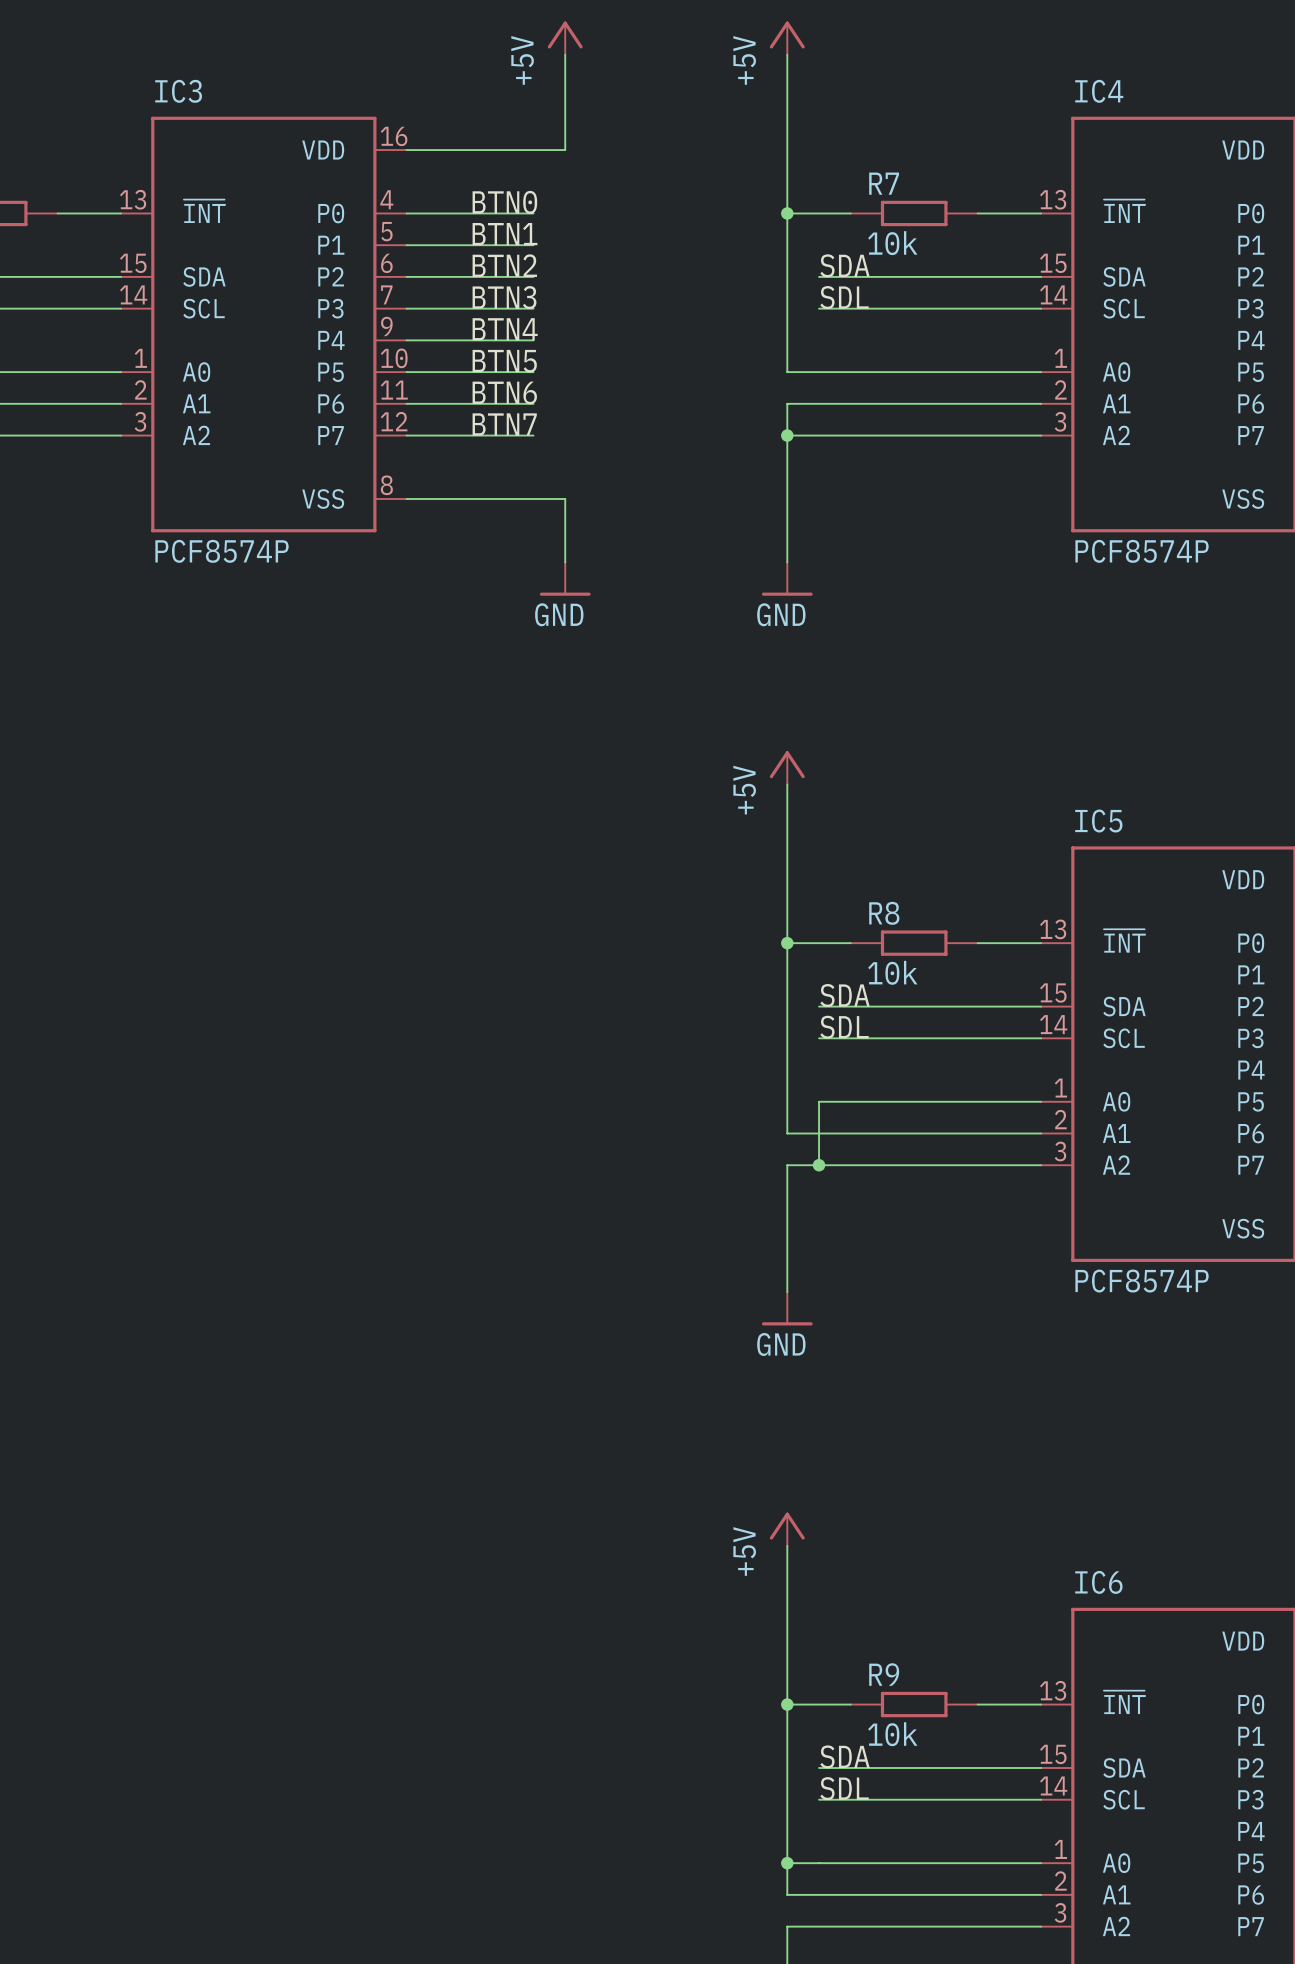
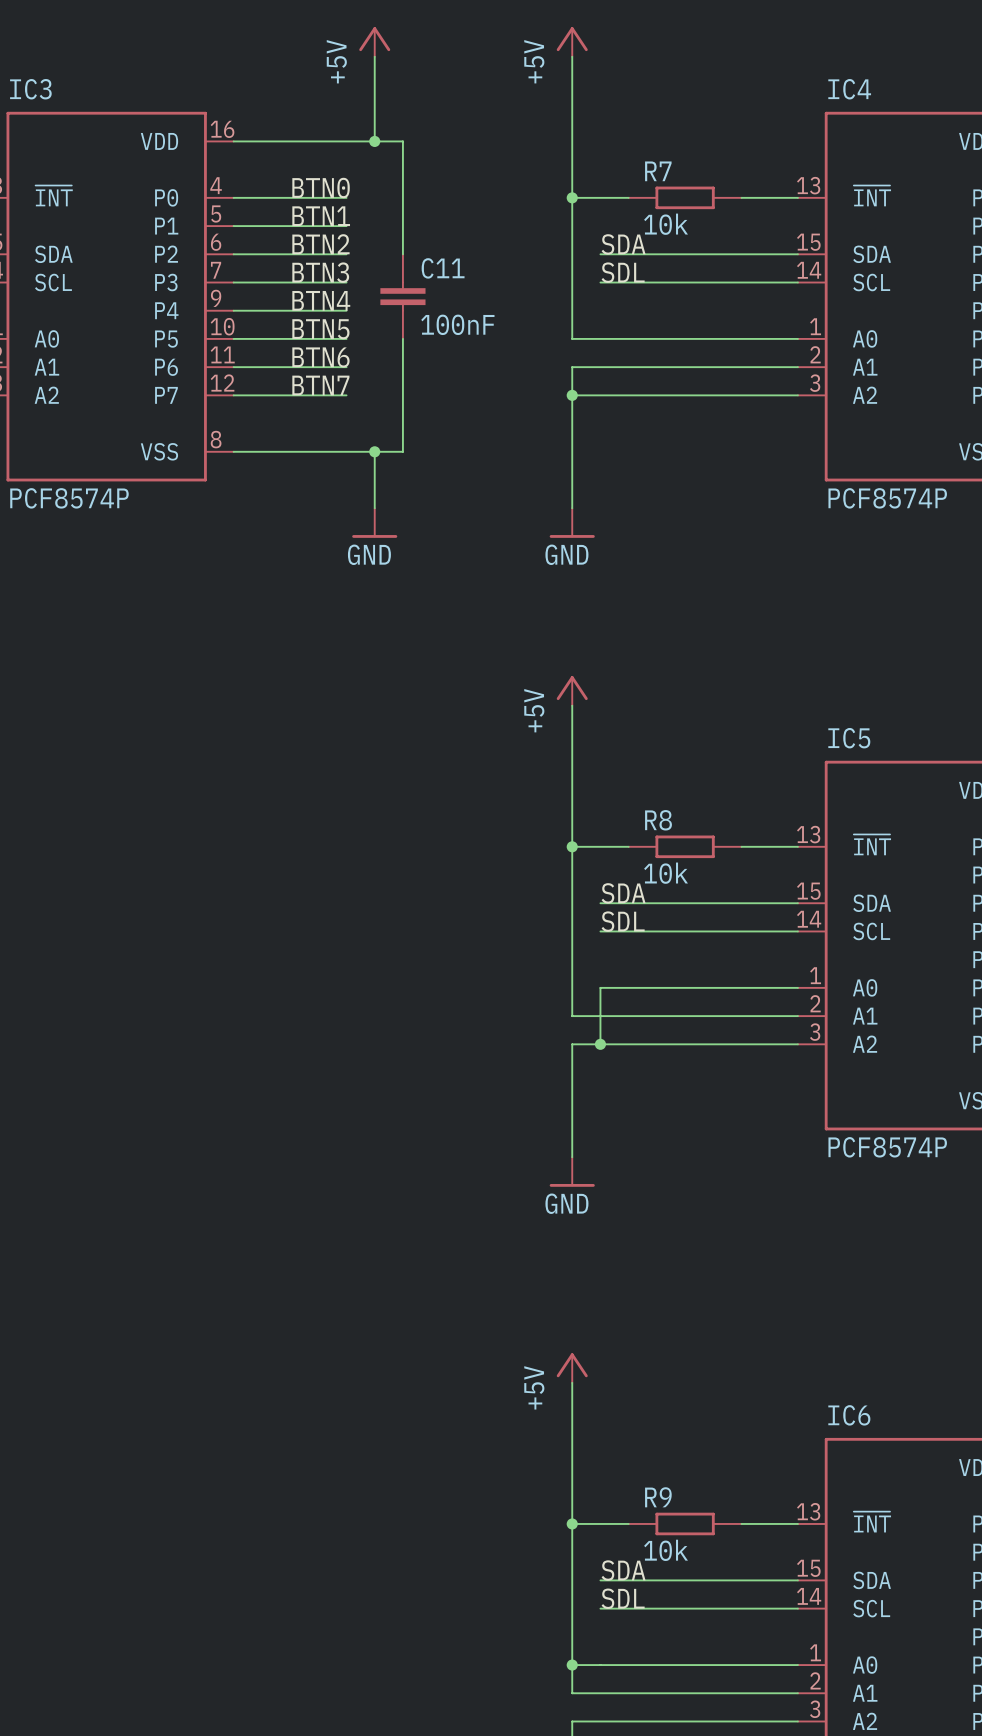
wire: none -> (374, 141) (402, 141) (402, 254)
junction: none -> (374, 141)
C11: none -> 100nF (402, 296)
wire: none -> (402, 338) (402, 451) (374, 451)
junction: none -> (374, 451)

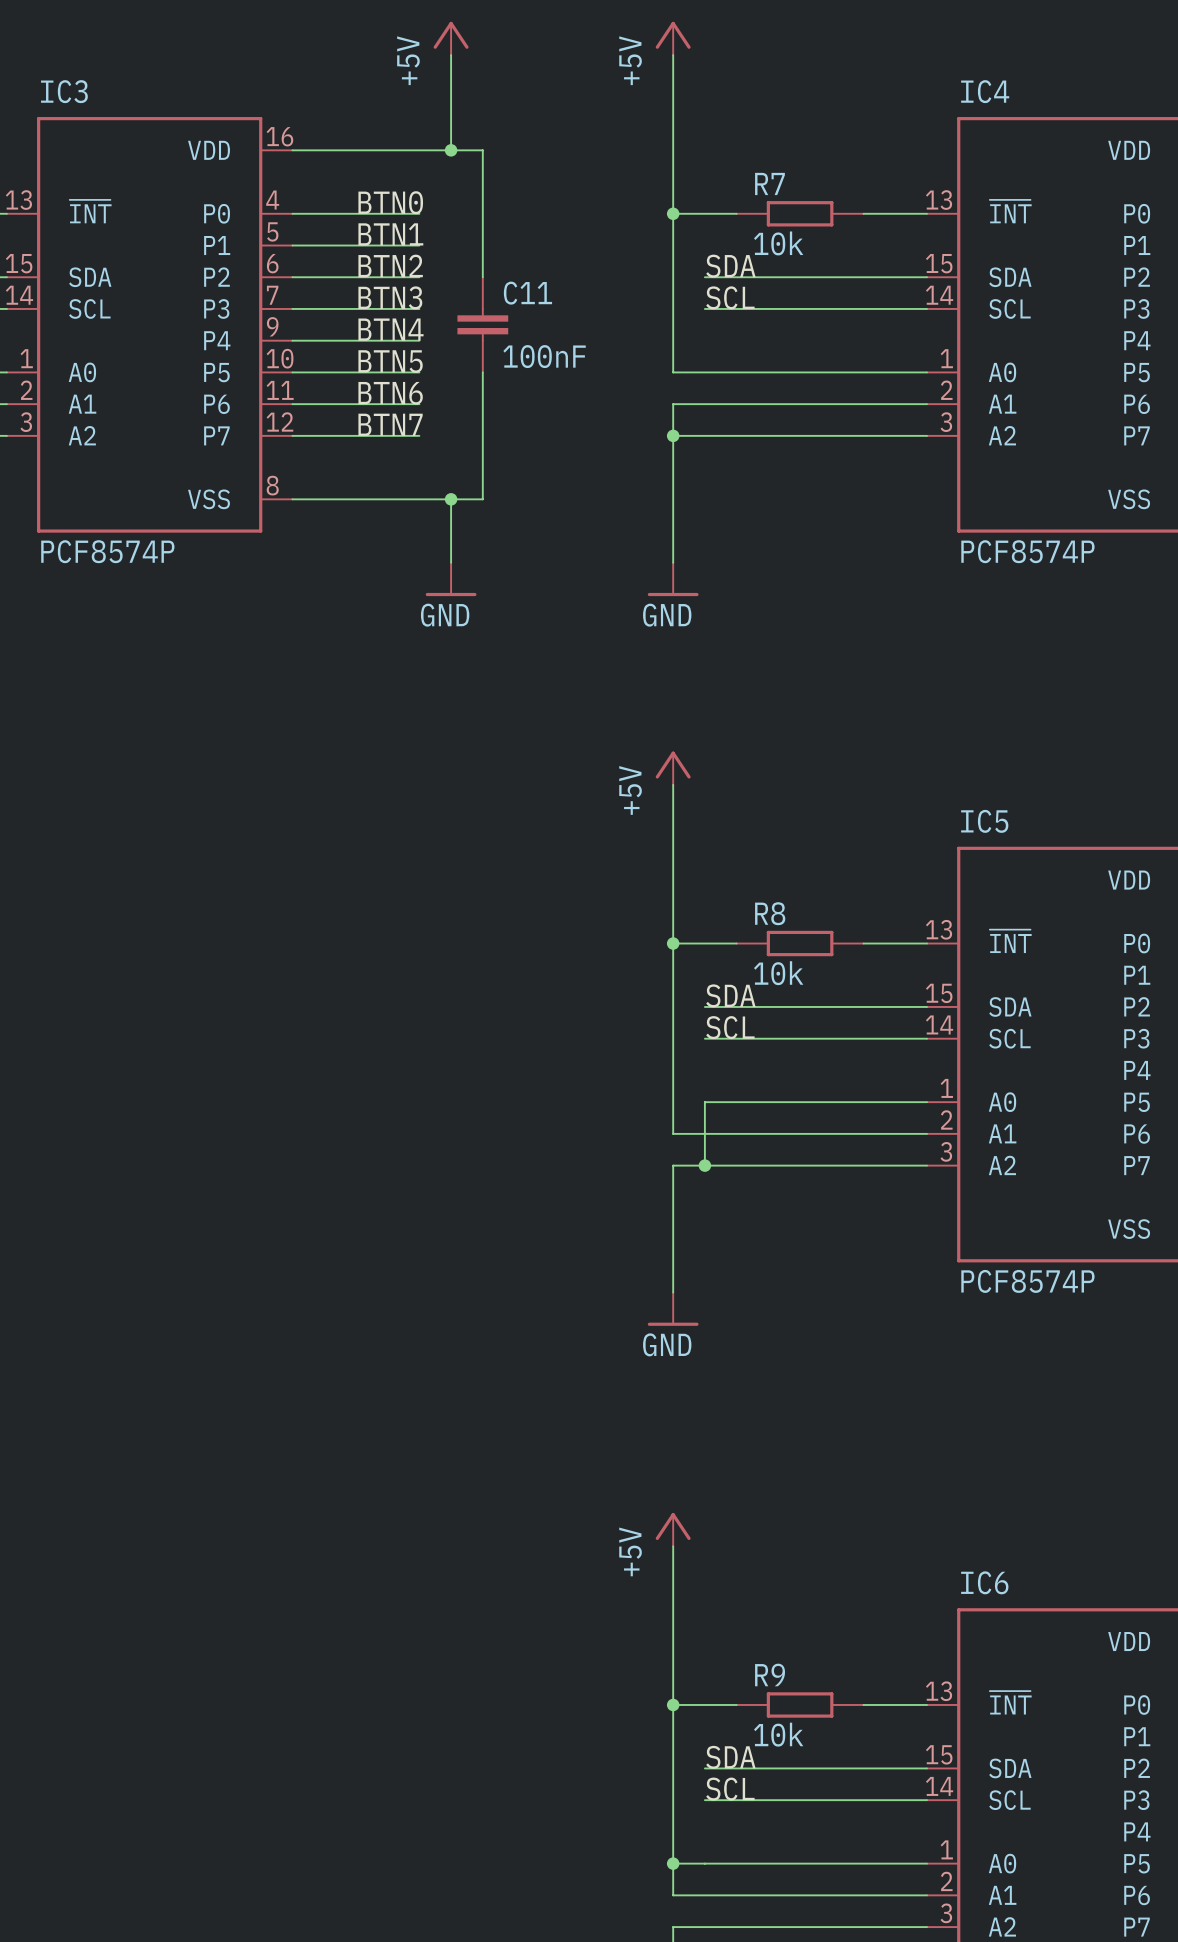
label: SDL (623, 272) -> SCL (730, 297)
label: SDL (623, 921) -> SCL (730, 1027)
label: SDL (623, 1598) -> SCL (730, 1789)

